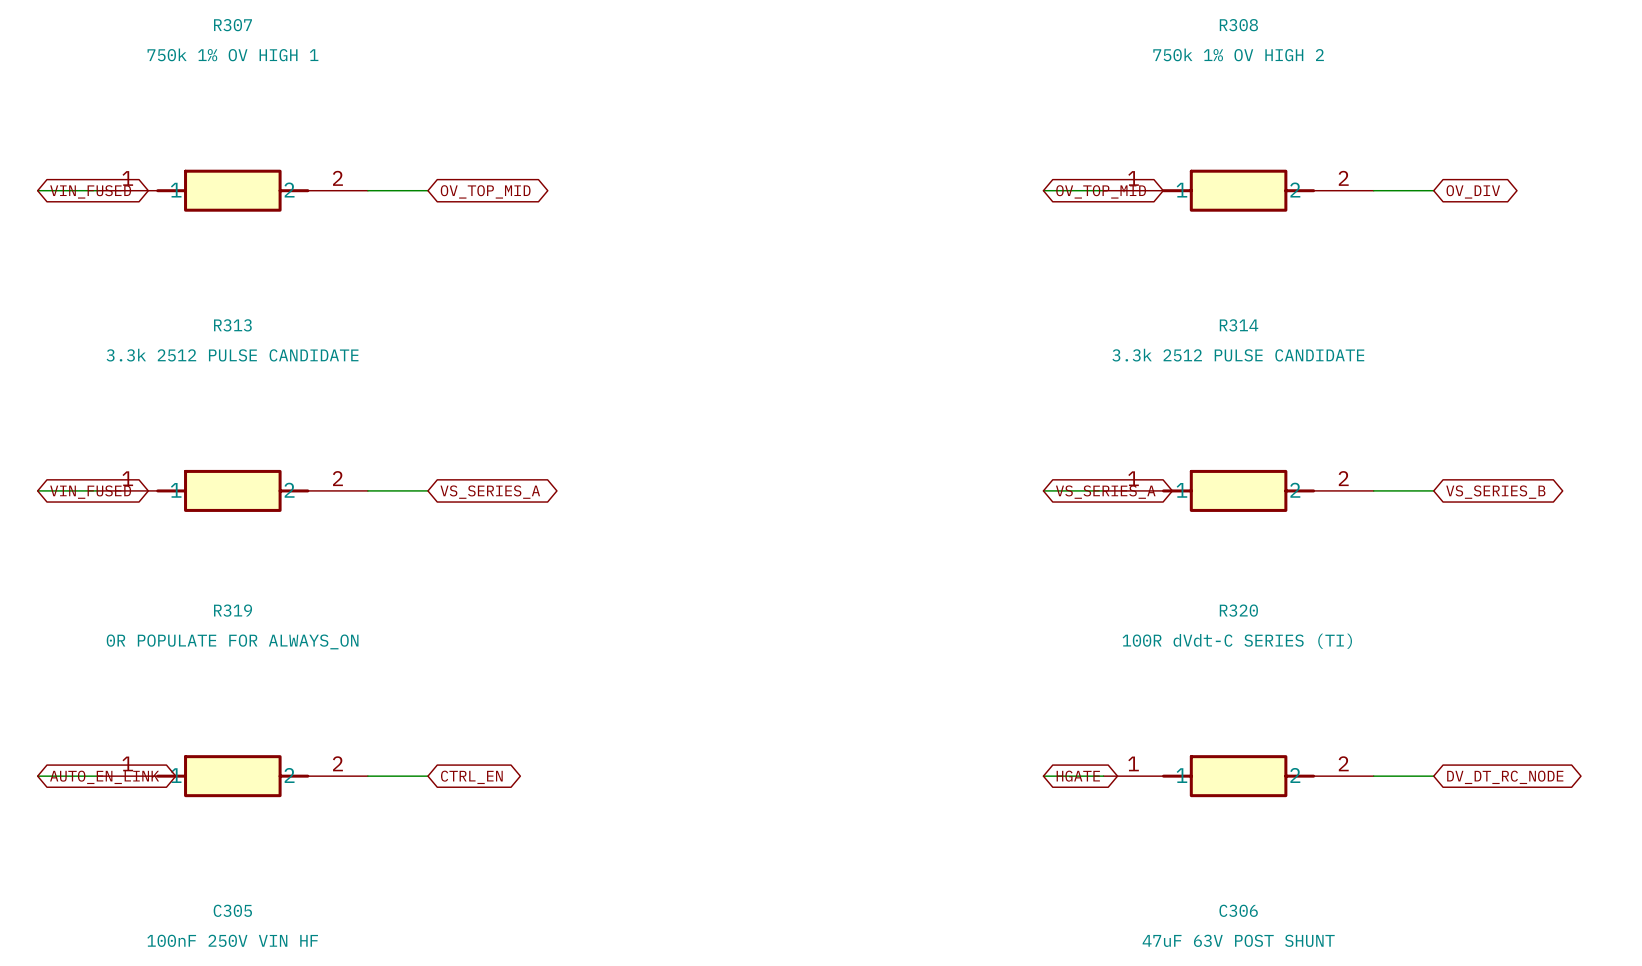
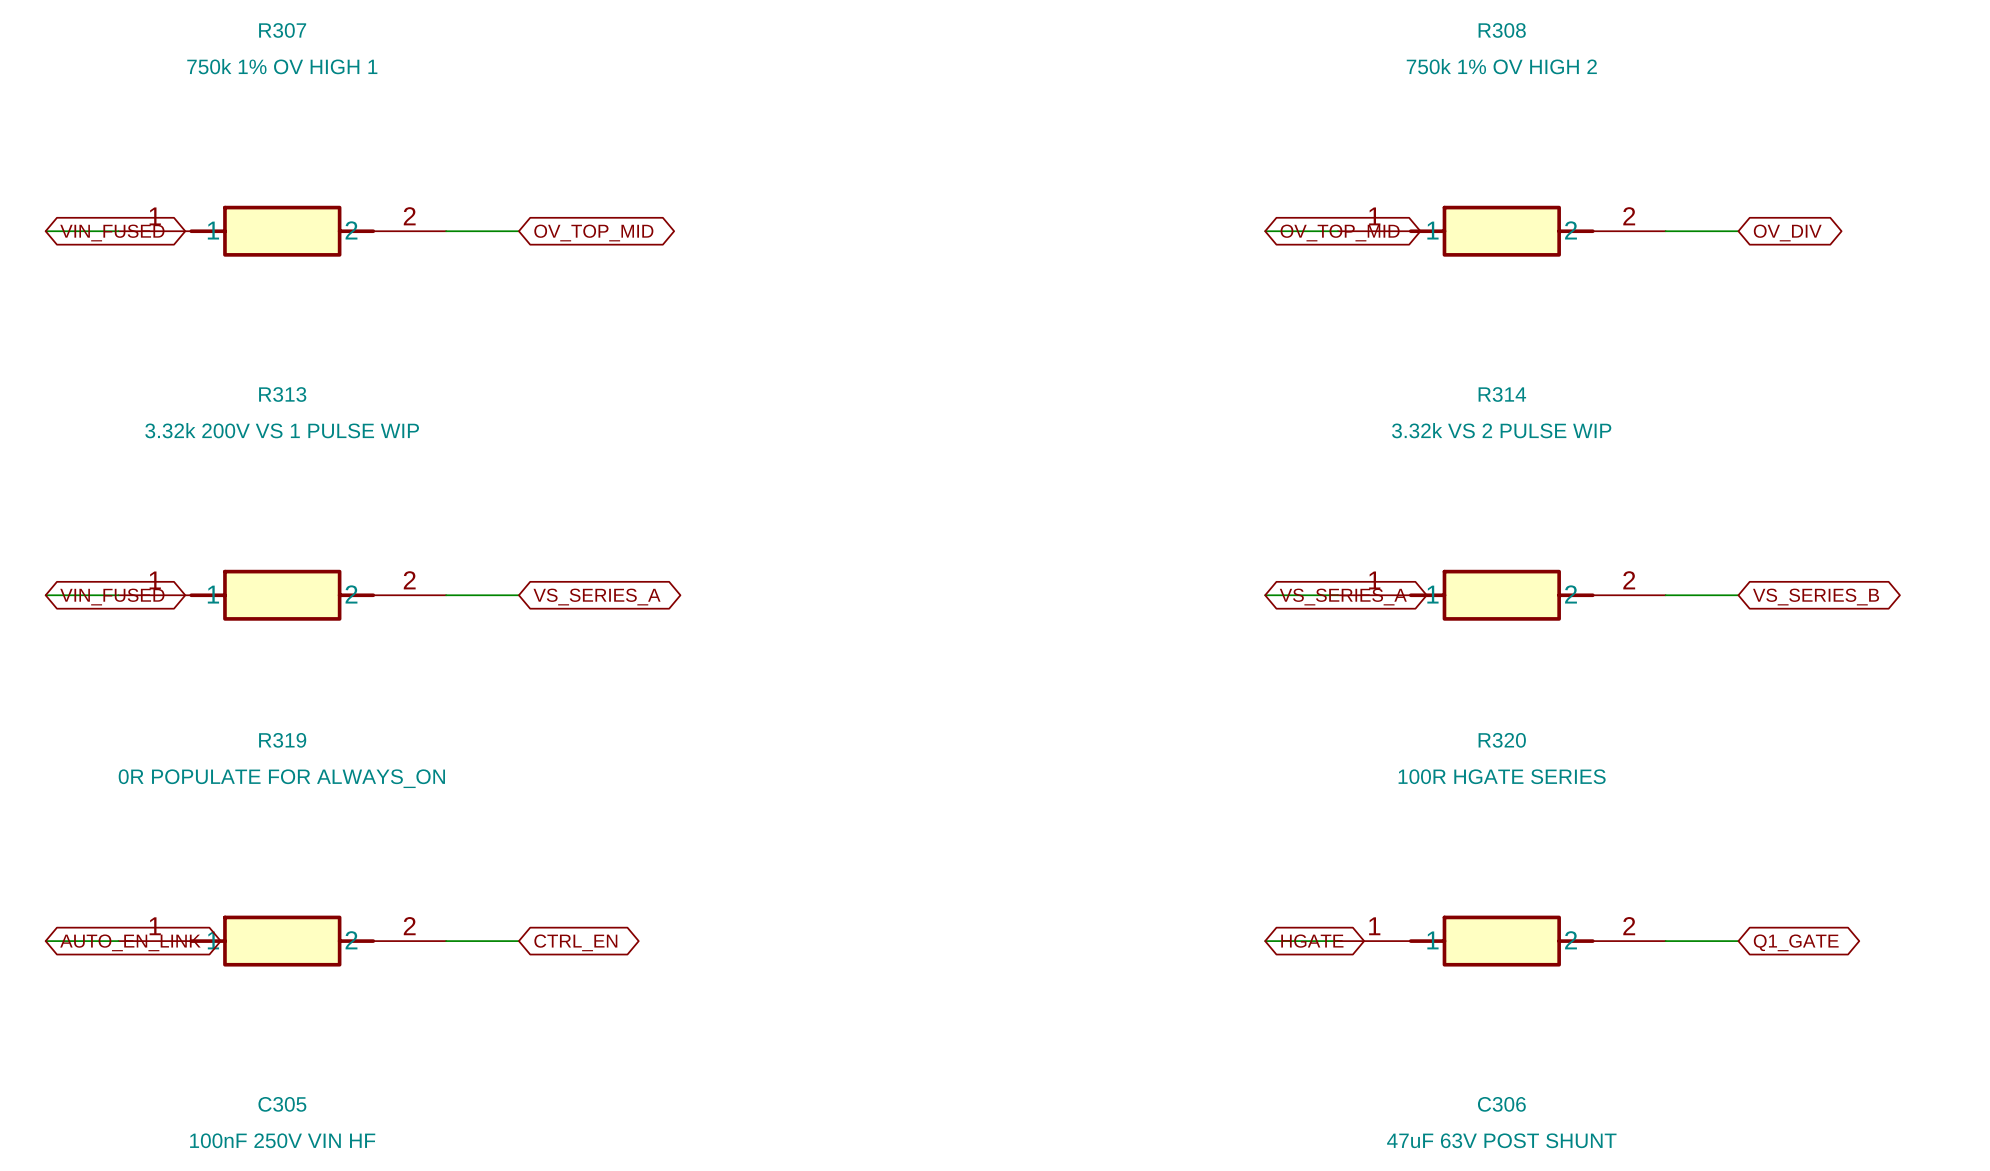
R313 value: 3.3k 2512 PULSE CANDIDATE (232, 355) -> 3.32k 200V VS 1 PULSE WIP (282, 430)
R314 value: 3.3k 2512 PULSE CANDIDATE (1238, 355) -> 3.32k VS 2 PULSE WIP (1501, 430)
R320 value: 100R dVdt-C SERIES (TI) (1237, 641) -> 100R HGATE SERIES (1502, 776)
global label: DV_DT_RC_NODE (1505, 777) -> Q1_GATE (1796, 942)

